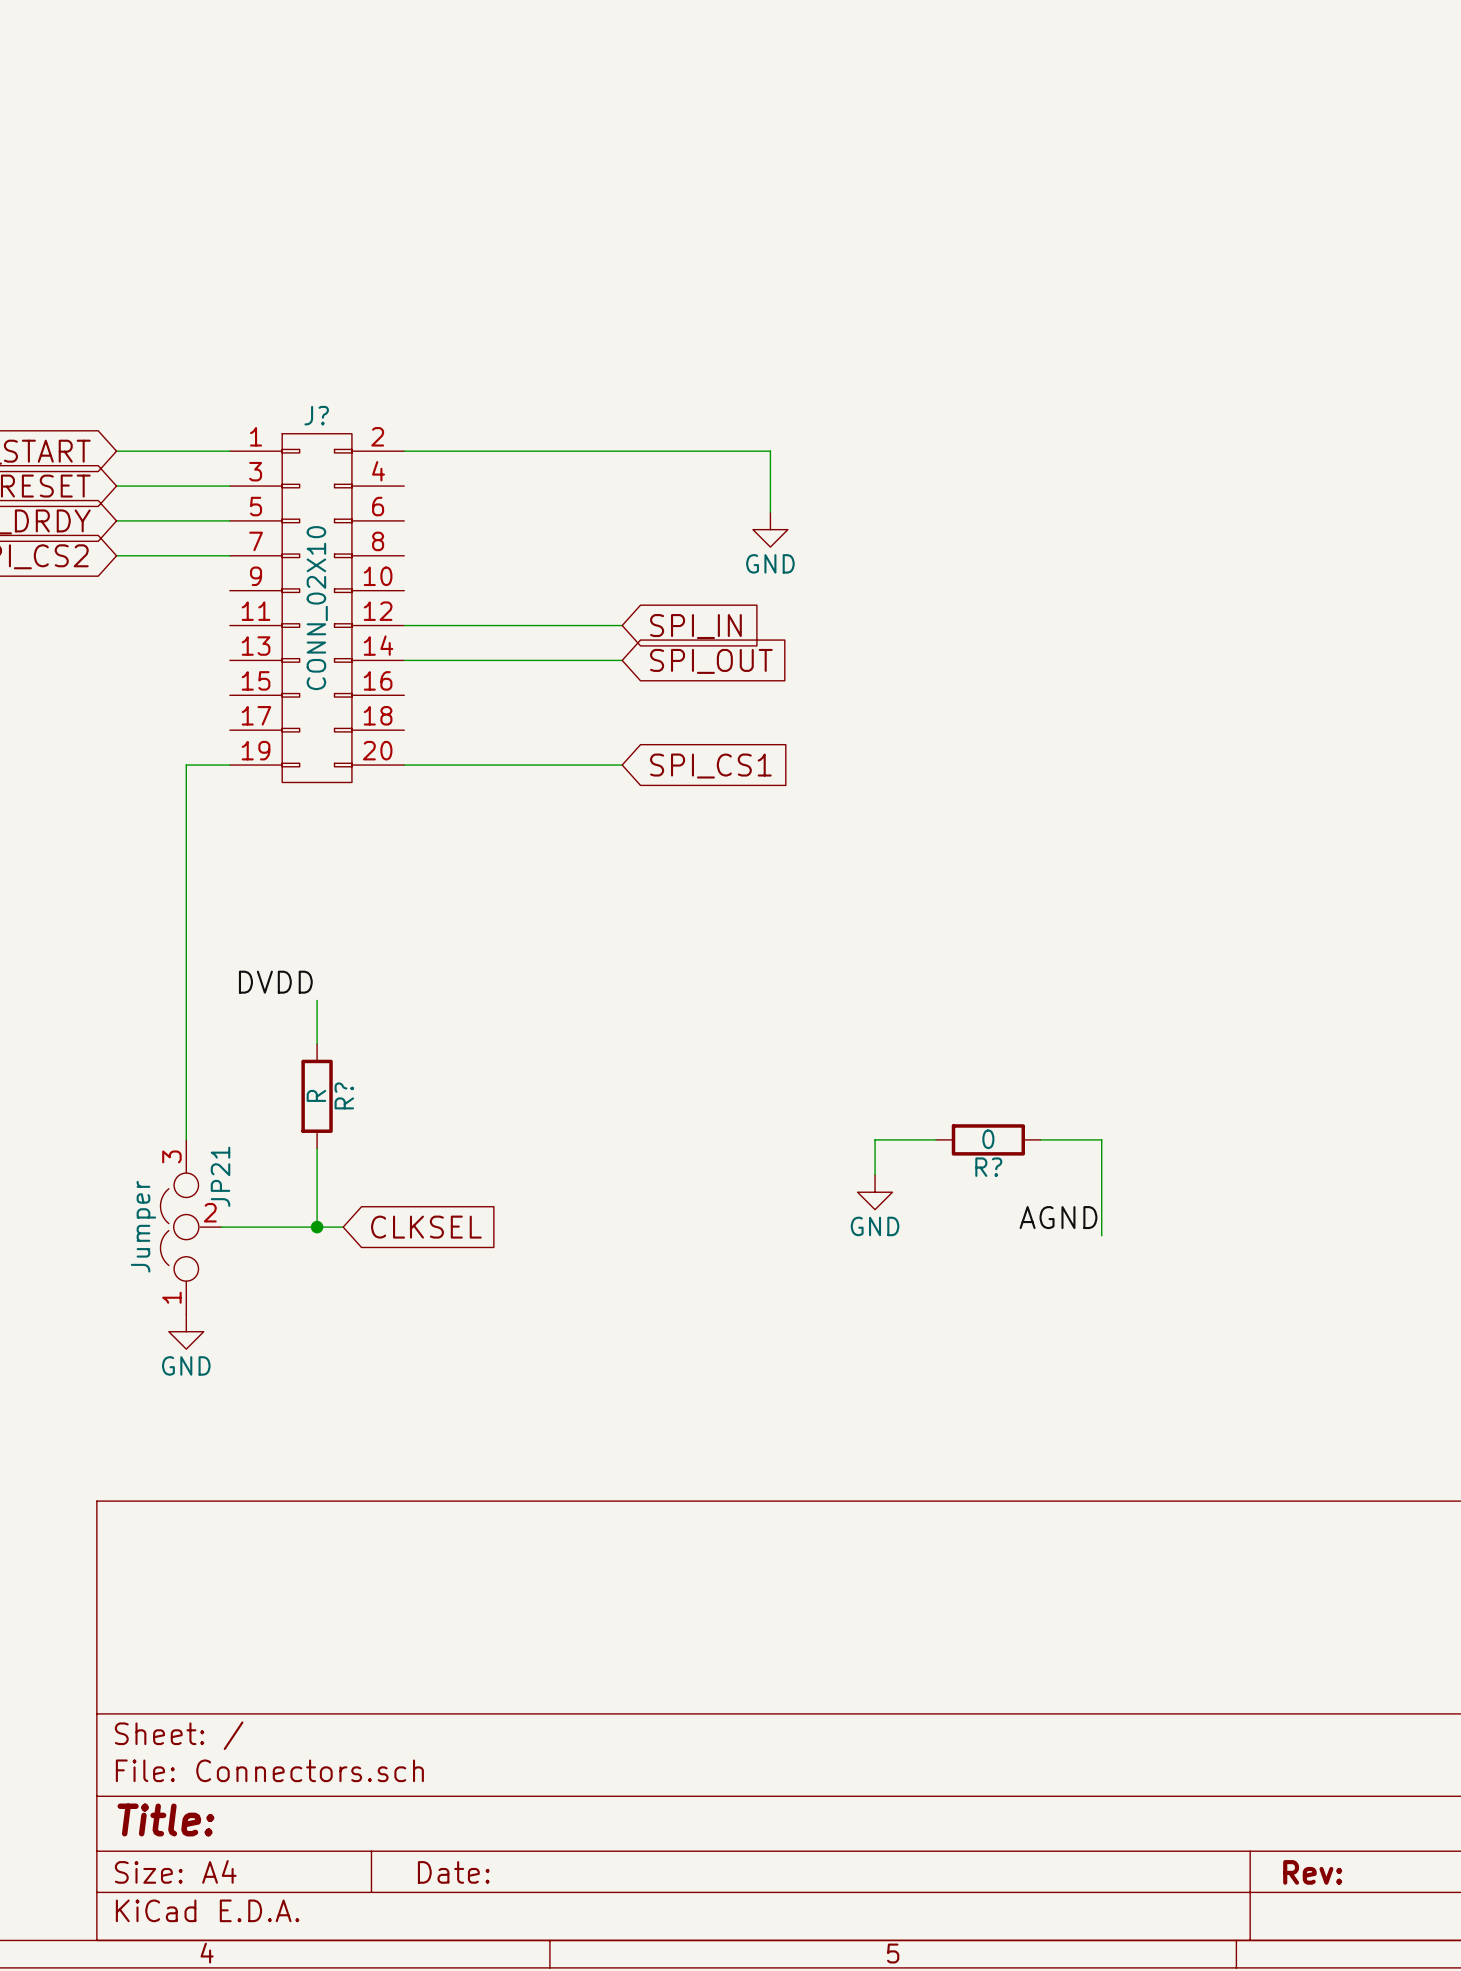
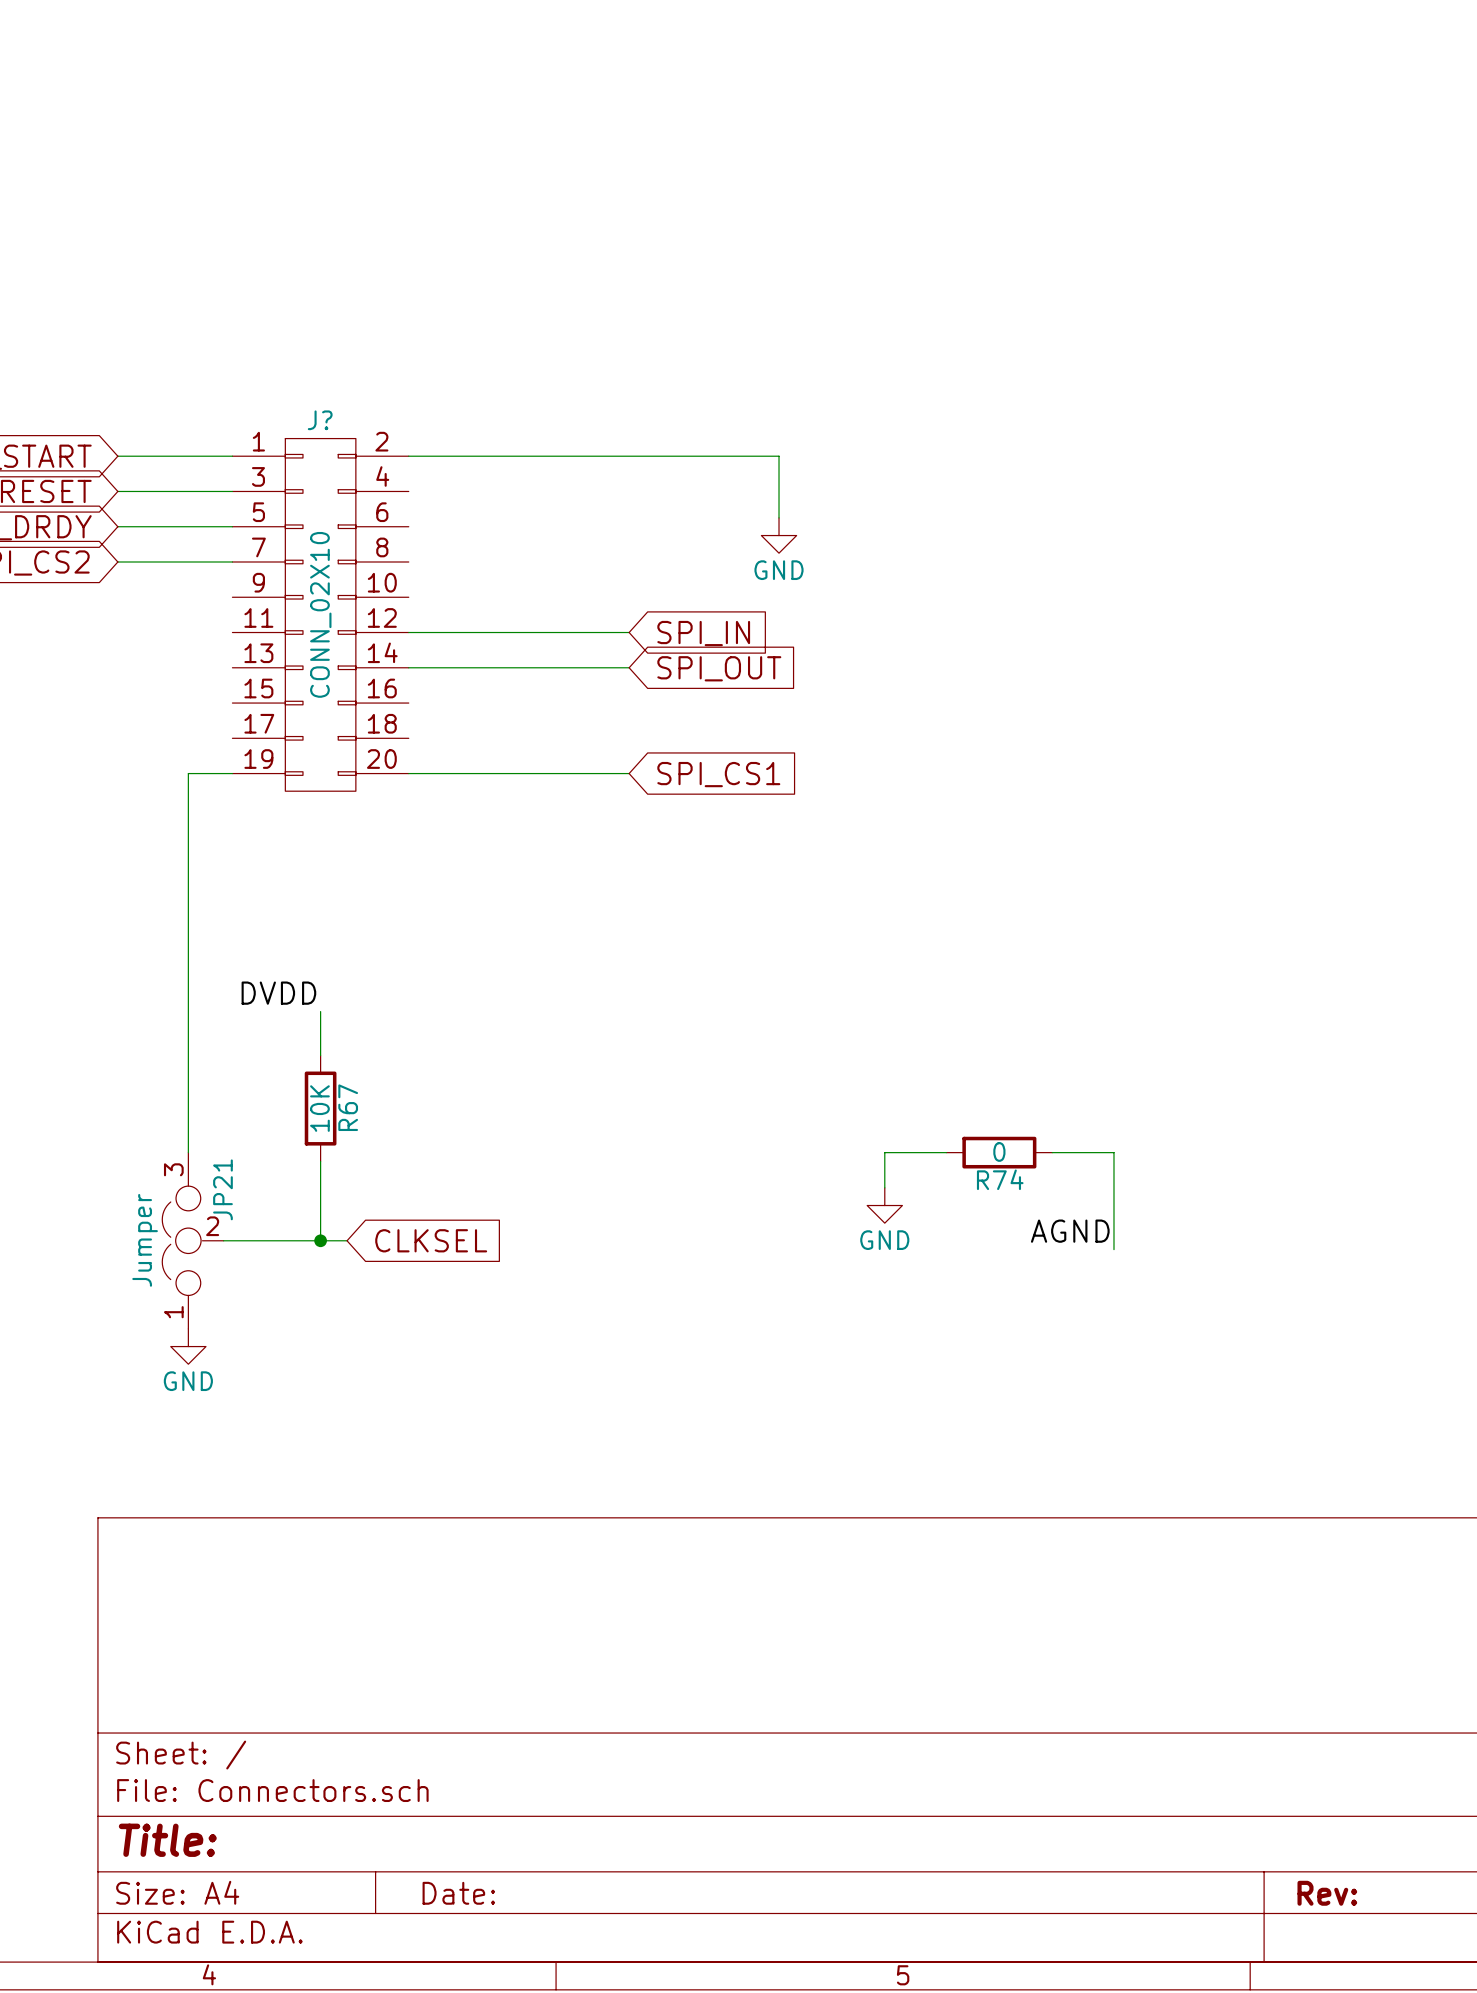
R? value: R (316, 1095) -> 10K (319, 1108)
R? name: R? (344, 1095) -> R67 (348, 1107)
R? name: R? (988, 1167) -> R74 (1000, 1179)

